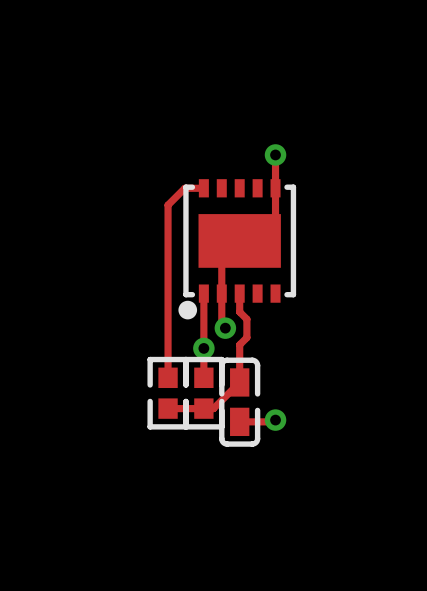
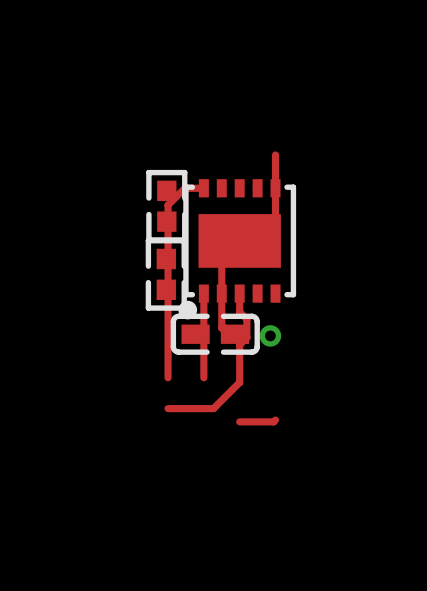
via: (275, 154) -> none
part: none -> (166, 206)
part: none -> (166, 274)
via: (225, 328) -> none
via: none -> (270, 335)
via: (203, 348) -> none
part: (168, 393) -> none
part: (203, 393) -> none
part rotation: 0° (239, 402) -> 90° clockwise (215, 334)
part position: (239, 402) -> (215, 334)
via: (275, 420) -> none

